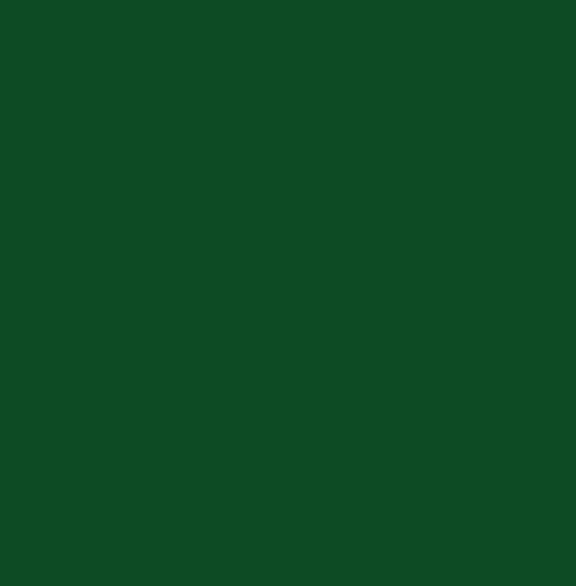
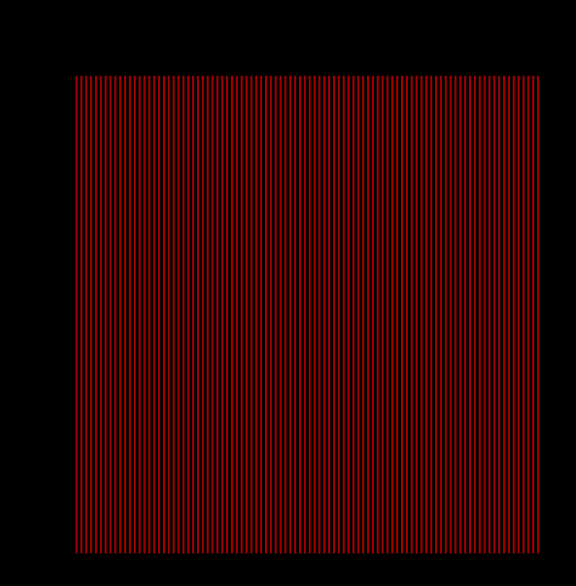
track: none -> (76, 76) (76, 552)
track: none -> (81, 76) (81, 552)
track: none -> (86, 76) (86, 552)
track: none -> (91, 76) (91, 552)
track: none -> (95, 76) (95, 552)
track: none -> (100, 76) (100, 552)
track: none -> (105, 76) (105, 552)
track: none -> (110, 76) (110, 552)
track: none -> (115, 76) (115, 552)
track: none -> (120, 76) (120, 552)
track: none -> (125, 76) (125, 552)
track: none -> (129, 76) (129, 552)
track: none -> (134, 76) (134, 552)
track: none -> (139, 76) (139, 552)
track: none -> (144, 76) (144, 552)
track: none -> (149, 76) (149, 552)
track: none -> (154, 76) (154, 552)
track: none -> (159, 76) (159, 552)
track: none -> (163, 76) (163, 552)
track: none -> (168, 76) (168, 552)
track: none -> (173, 76) (173, 552)
track: none -> (178, 76) (178, 552)
track: none -> (183, 76) (183, 552)
track: none -> (188, 76) (188, 552)
track: none -> (193, 76) (193, 552)
track: none -> (197, 76) (197, 552)
track: none -> (202, 76) (202, 552)
track: none -> (207, 76) (207, 552)
track: none -> (212, 76) (212, 552)
track: none -> (217, 76) (217, 552)
track: none -> (222, 76) (222, 552)
track: none -> (227, 76) (227, 552)
track: none -> (231, 76) (231, 552)
track: none -> (236, 76) (236, 552)
track: none -> (241, 76) (241, 552)
track: none -> (246, 76) (246, 552)
track: none -> (251, 76) (251, 552)
track: none -> (256, 76) (256, 552)
track: none -> (261, 76) (261, 552)
track: none -> (265, 76) (265, 552)
track: none -> (270, 76) (270, 552)
track: none -> (275, 76) (275, 552)
track: none -> (280, 76) (280, 552)
track: none -> (285, 76) (285, 552)
track: none -> (290, 76) (290, 552)
track: none -> (295, 76) (295, 552)
track: none -> (299, 76) (299, 552)
track: none -> (304, 76) (304, 552)
track: none -> (309, 76) (309, 552)
track: none -> (314, 76) (314, 552)
track: none -> (319, 76) (319, 552)
track: none -> (324, 76) (324, 552)
track: none -> (329, 76) (329, 552)
track: none -> (334, 76) (334, 552)
track: none -> (338, 76) (338, 552)
track: none -> (343, 76) (343, 552)
track: none -> (348, 76) (348, 552)
track: none -> (353, 76) (353, 552)
track: none -> (358, 76) (358, 552)
track: none -> (363, 76) (363, 552)
track: none -> (368, 76) (368, 552)
track: none -> (372, 76) (372, 552)
track: none -> (377, 76) (377, 552)
track: none -> (382, 76) (382, 552)
track: none -> (387, 76) (387, 552)
track: none -> (392, 76) (392, 552)
track: none -> (397, 76) (397, 552)
track: none -> (402, 76) (402, 552)
track: none -> (406, 76) (406, 552)
track: none -> (411, 76) (411, 552)
track: none -> (416, 76) (416, 552)
track: none -> (421, 76) (421, 552)
track: none -> (426, 76) (426, 552)
track: none -> (431, 76) (431, 552)
track: none -> (436, 76) (436, 552)
track: none -> (440, 76) (440, 552)
track: none -> (445, 76) (445, 552)
track: none -> (450, 76) (450, 552)
track: none -> (455, 76) (455, 552)
track: none -> (460, 76) (460, 552)
track: none -> (465, 76) (465, 552)
track: none -> (470, 76) (470, 552)
track: none -> (474, 76) (474, 552)
track: none -> (479, 76) (479, 552)
track: none -> (484, 76) (484, 552)
track: none -> (489, 76) (489, 552)
track: none -> (494, 76) (494, 552)
track: none -> (499, 76) (499, 552)
track: none -> (504, 76) (504, 552)
track: none -> (508, 76) (508, 552)
track: none -> (513, 76) (513, 552)
track: none -> (518, 76) (518, 552)
track: none -> (523, 76) (523, 552)
track: none -> (528, 76) (528, 552)
track: none -> (533, 76) (533, 552)
track: none -> (538, 76) (538, 552)

